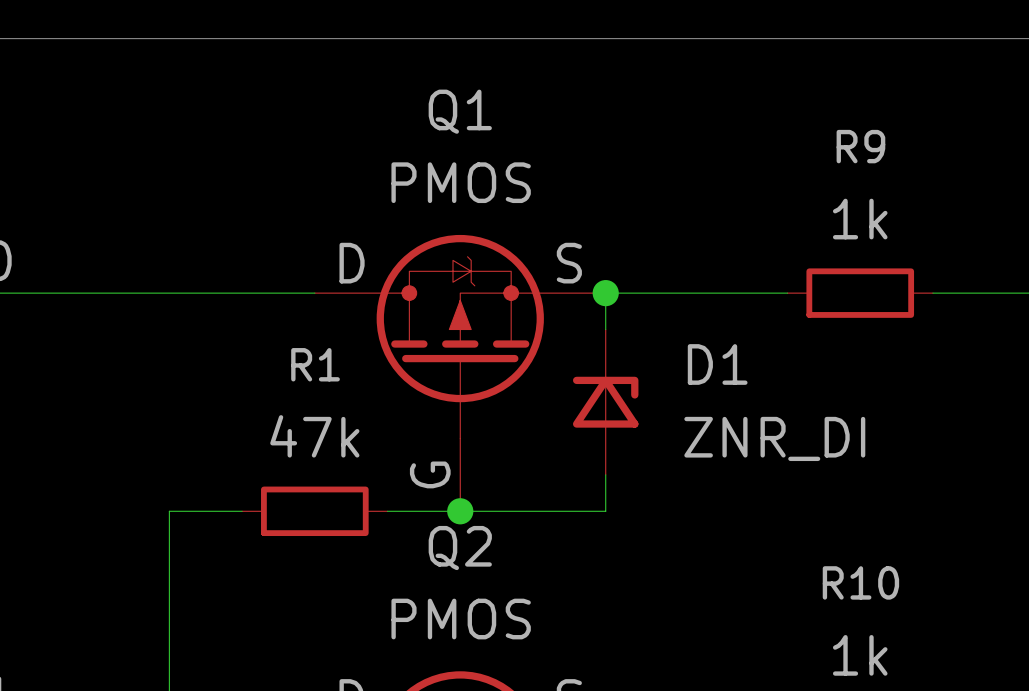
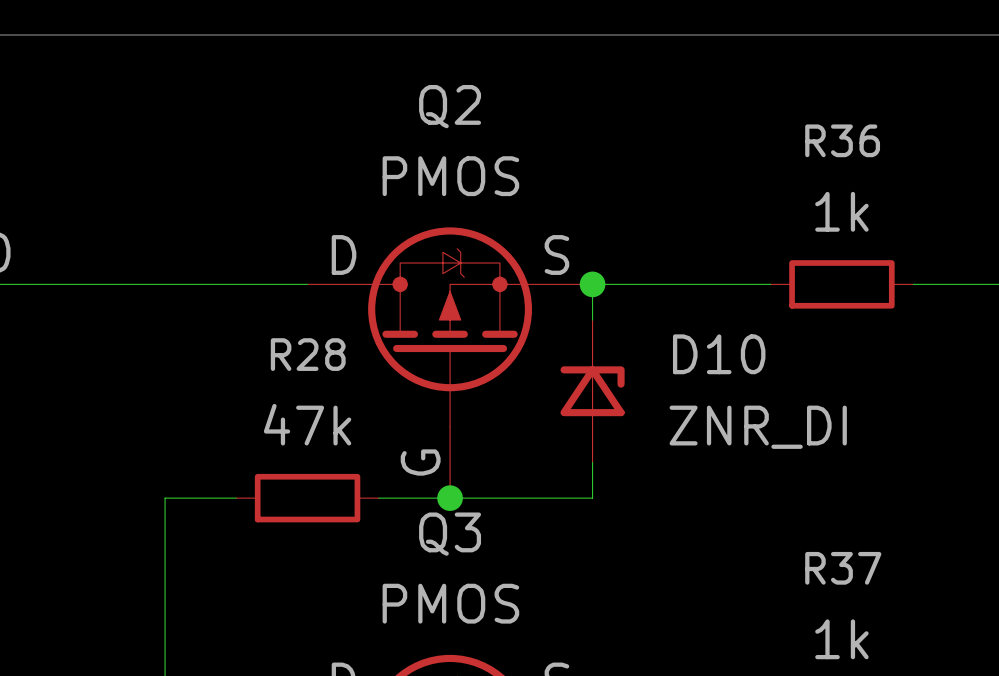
Q1 name: Q1 (460, 111) -> Q2 (450, 106)
R9 name: R9 (860, 146) -> R36 (842, 140)
R1 name: R1 (315, 364) -> R28 (308, 354)
D1 name: D1 (717, 364) -> D10 (719, 354)
Q2 name: Q2 (460, 548) -> Q3 (450, 534)
R10 name: R10 (860, 582) -> R37 (843, 568)

